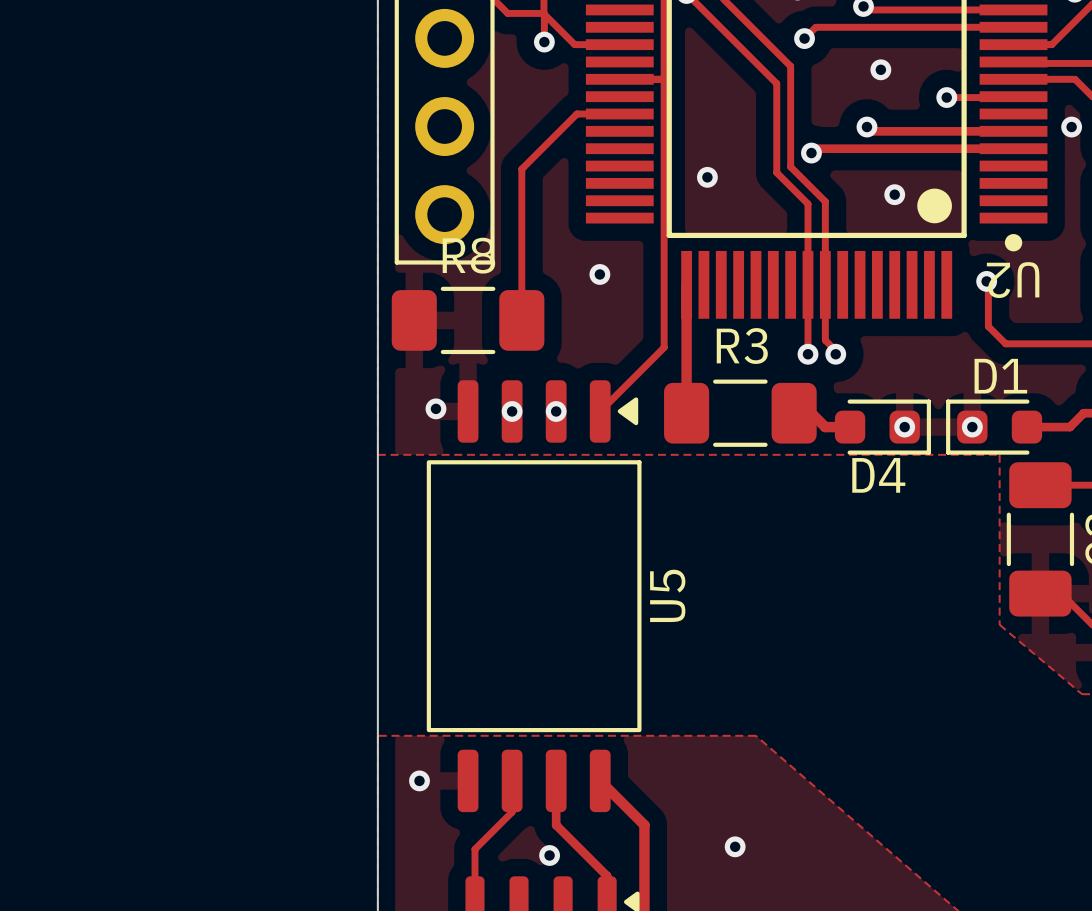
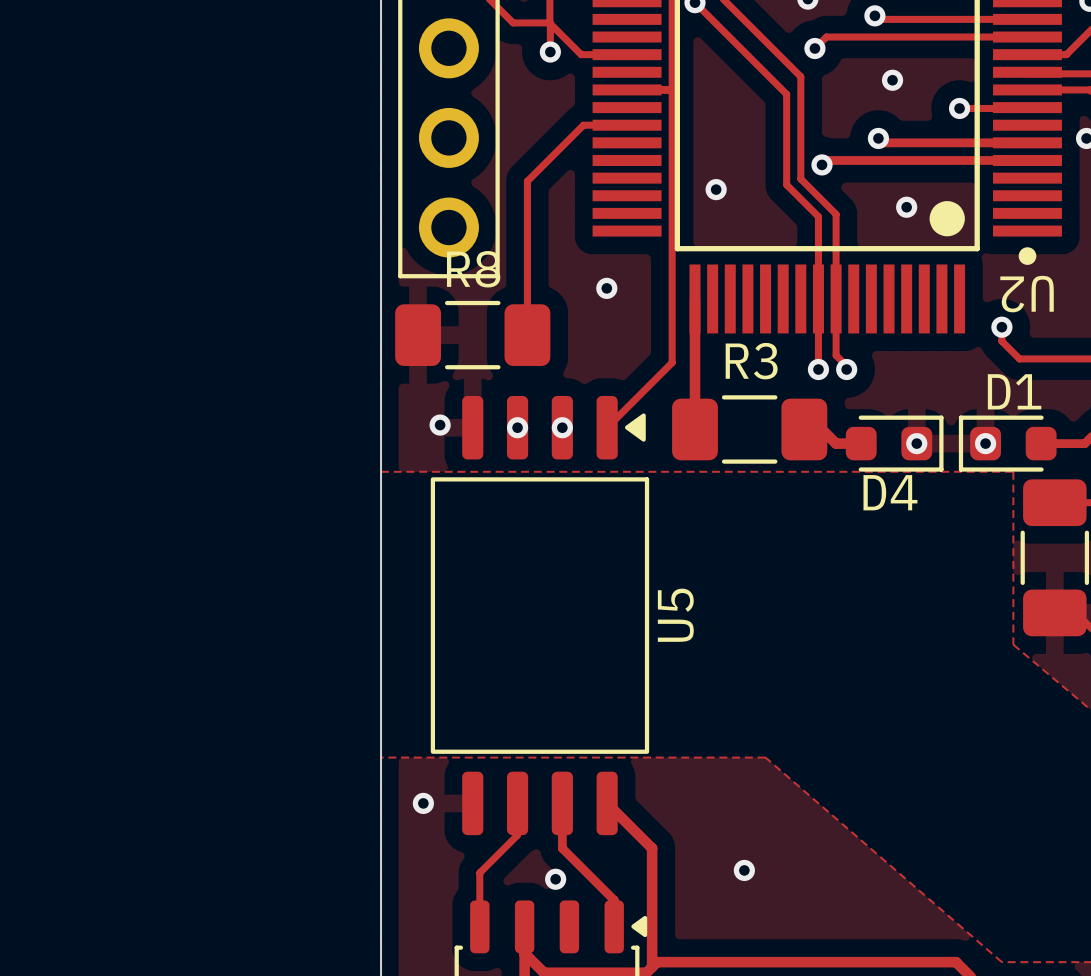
track: (986, 281) (988, 283) (988, 312) -> none
via position: (986, 281) -> (1001, 327)

